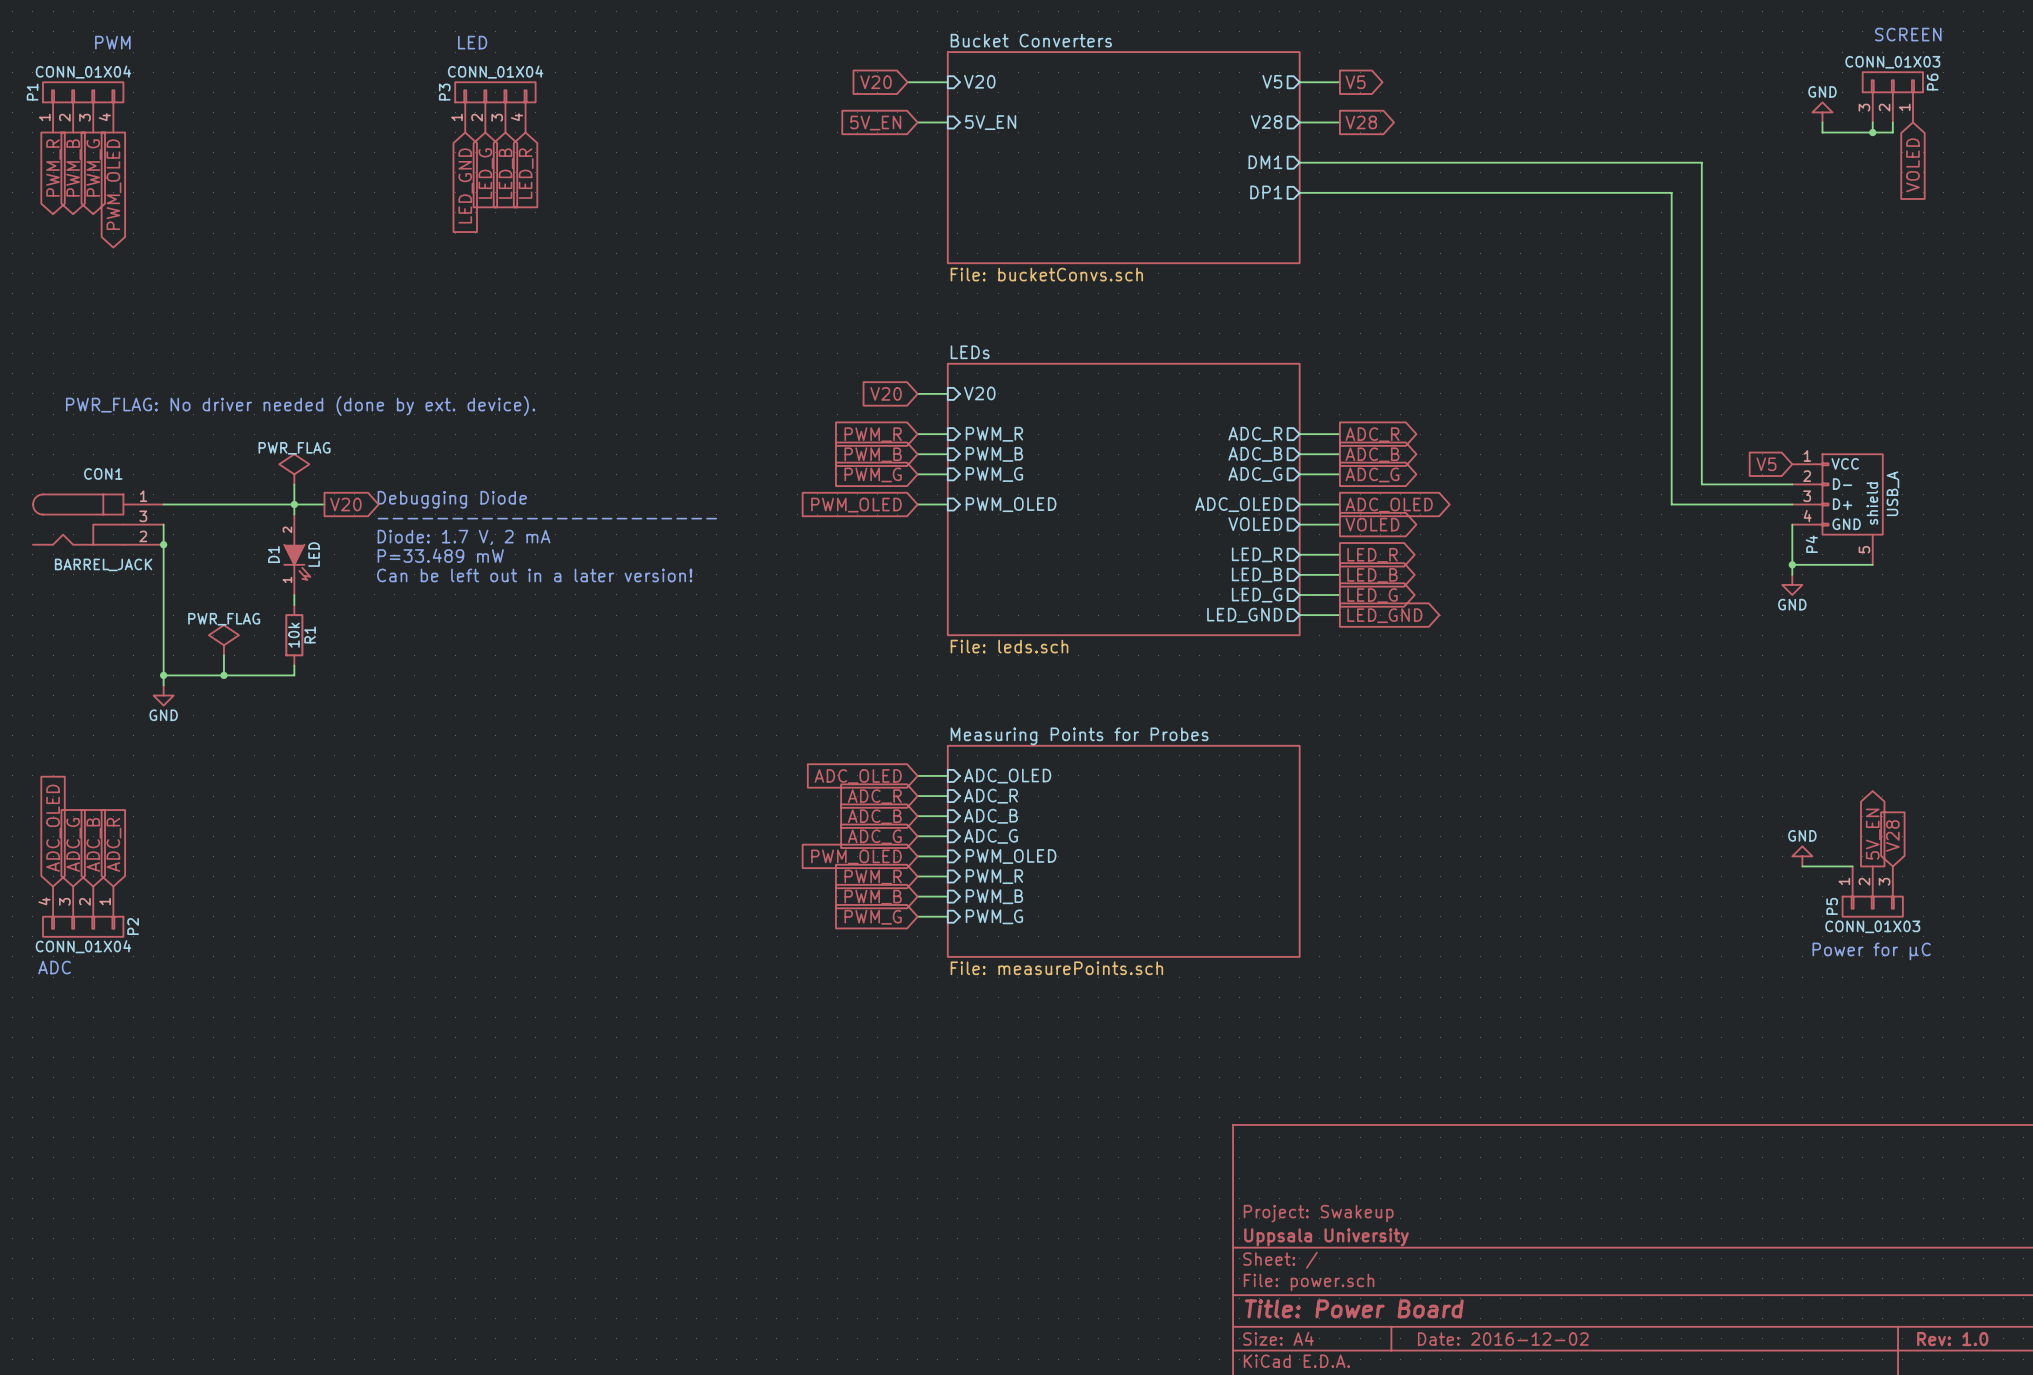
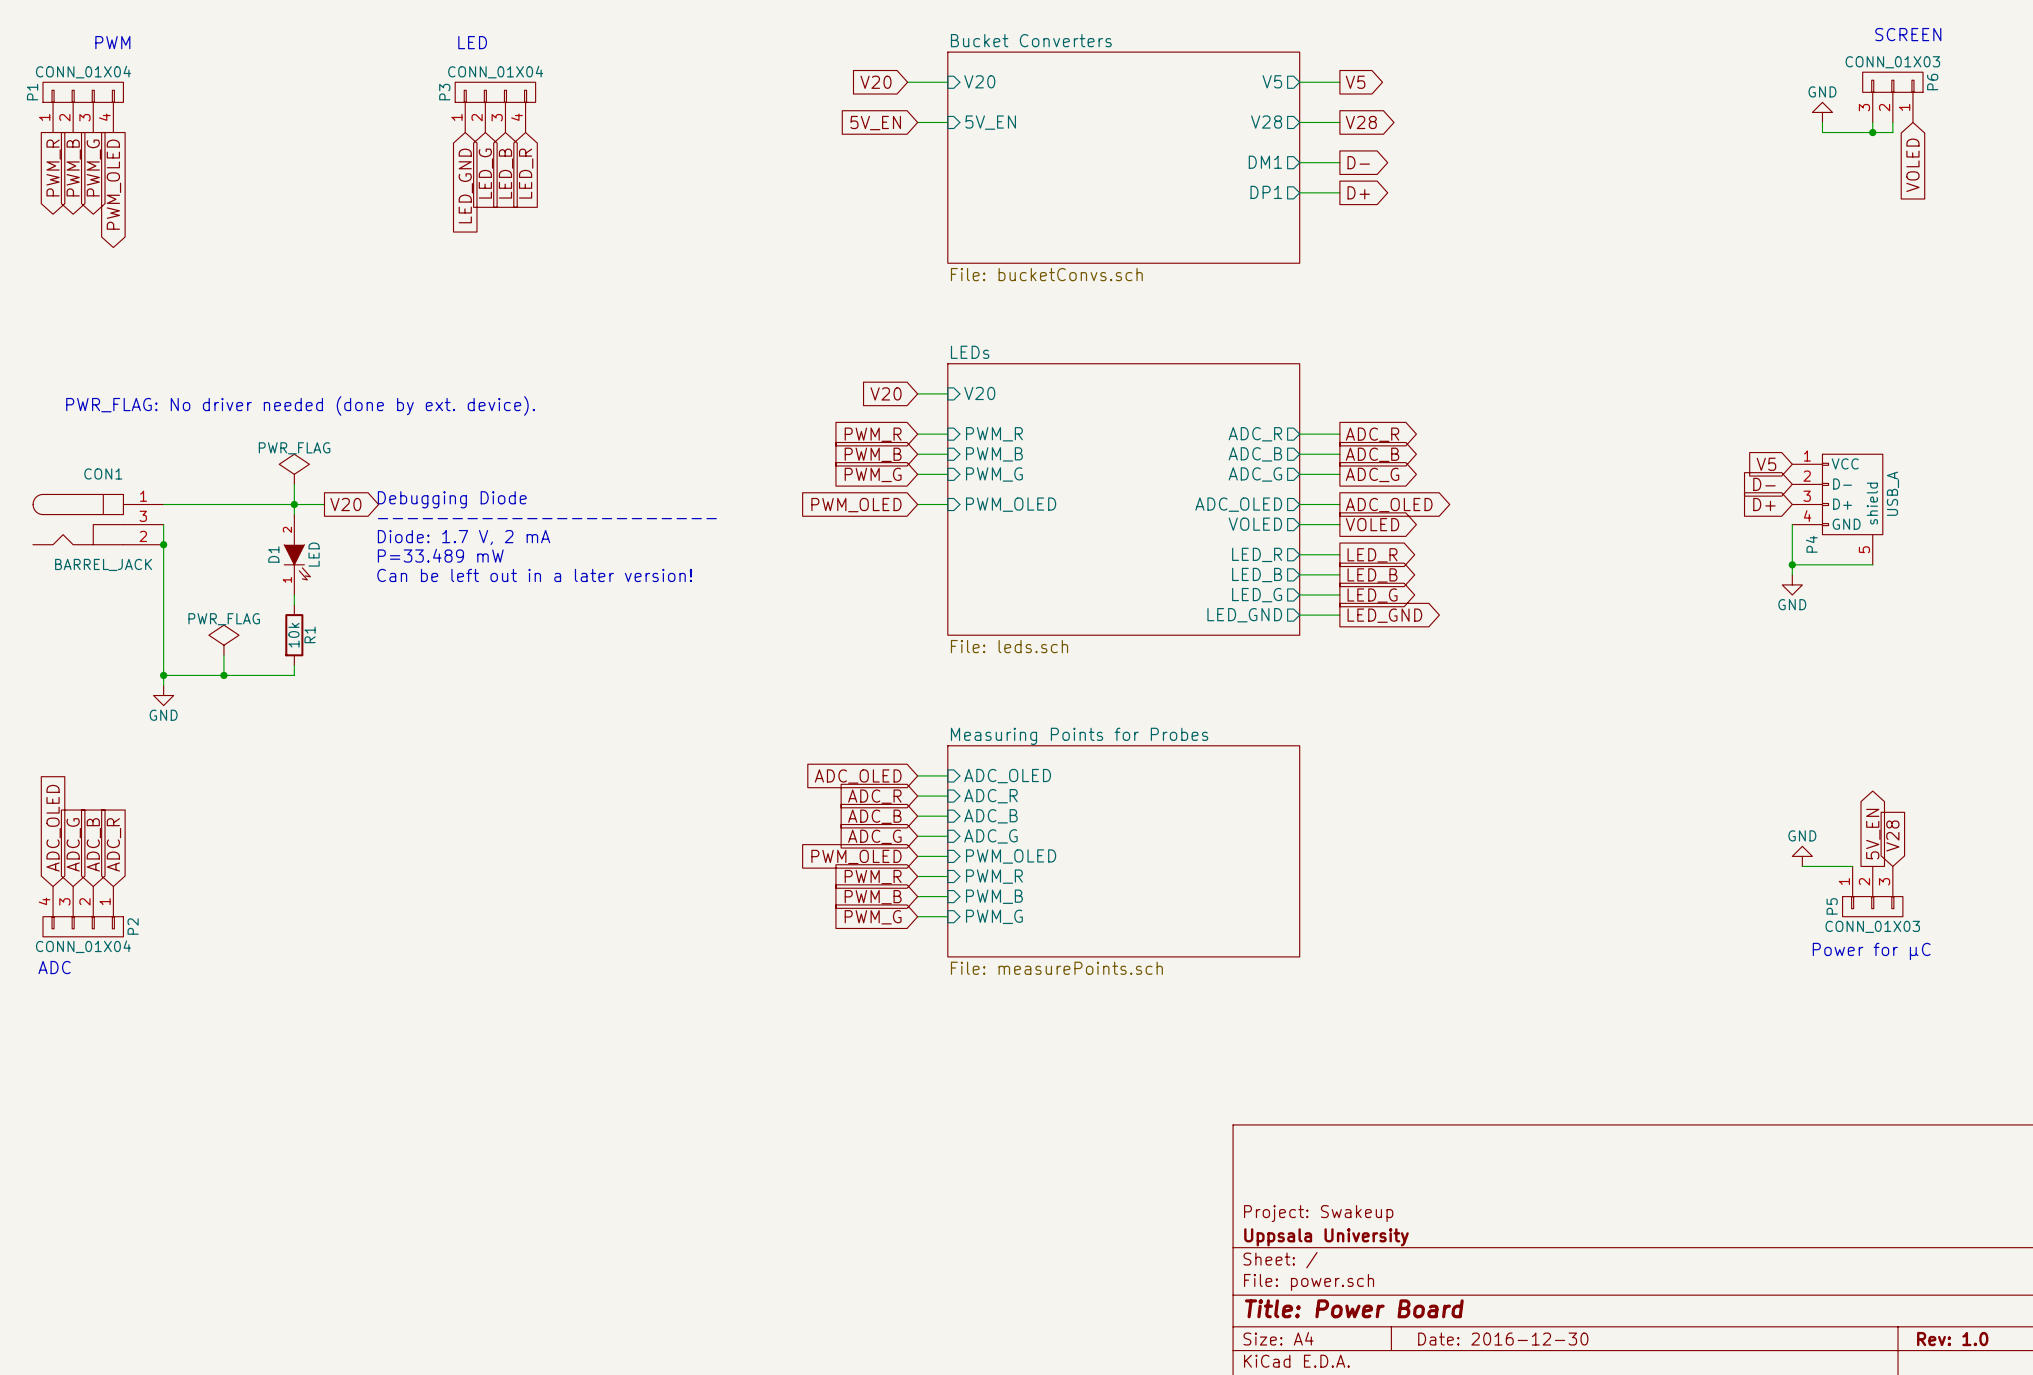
wire: (1339, 162) (1701, 162) (1701, 484) (1792, 484) -> none
global label: none -> D- (1358, 162)
wire: (1339, 192) (1671, 192) (1671, 504) (1792, 504) -> none
global label: none -> D+ (1358, 192)
global label: none -> D- (1764, 484)
global label: none -> D+ (1764, 504)
title block: Date: 2016-12-02 (1503, 1339) -> Date: 2016-12-30 (1503, 1339)

